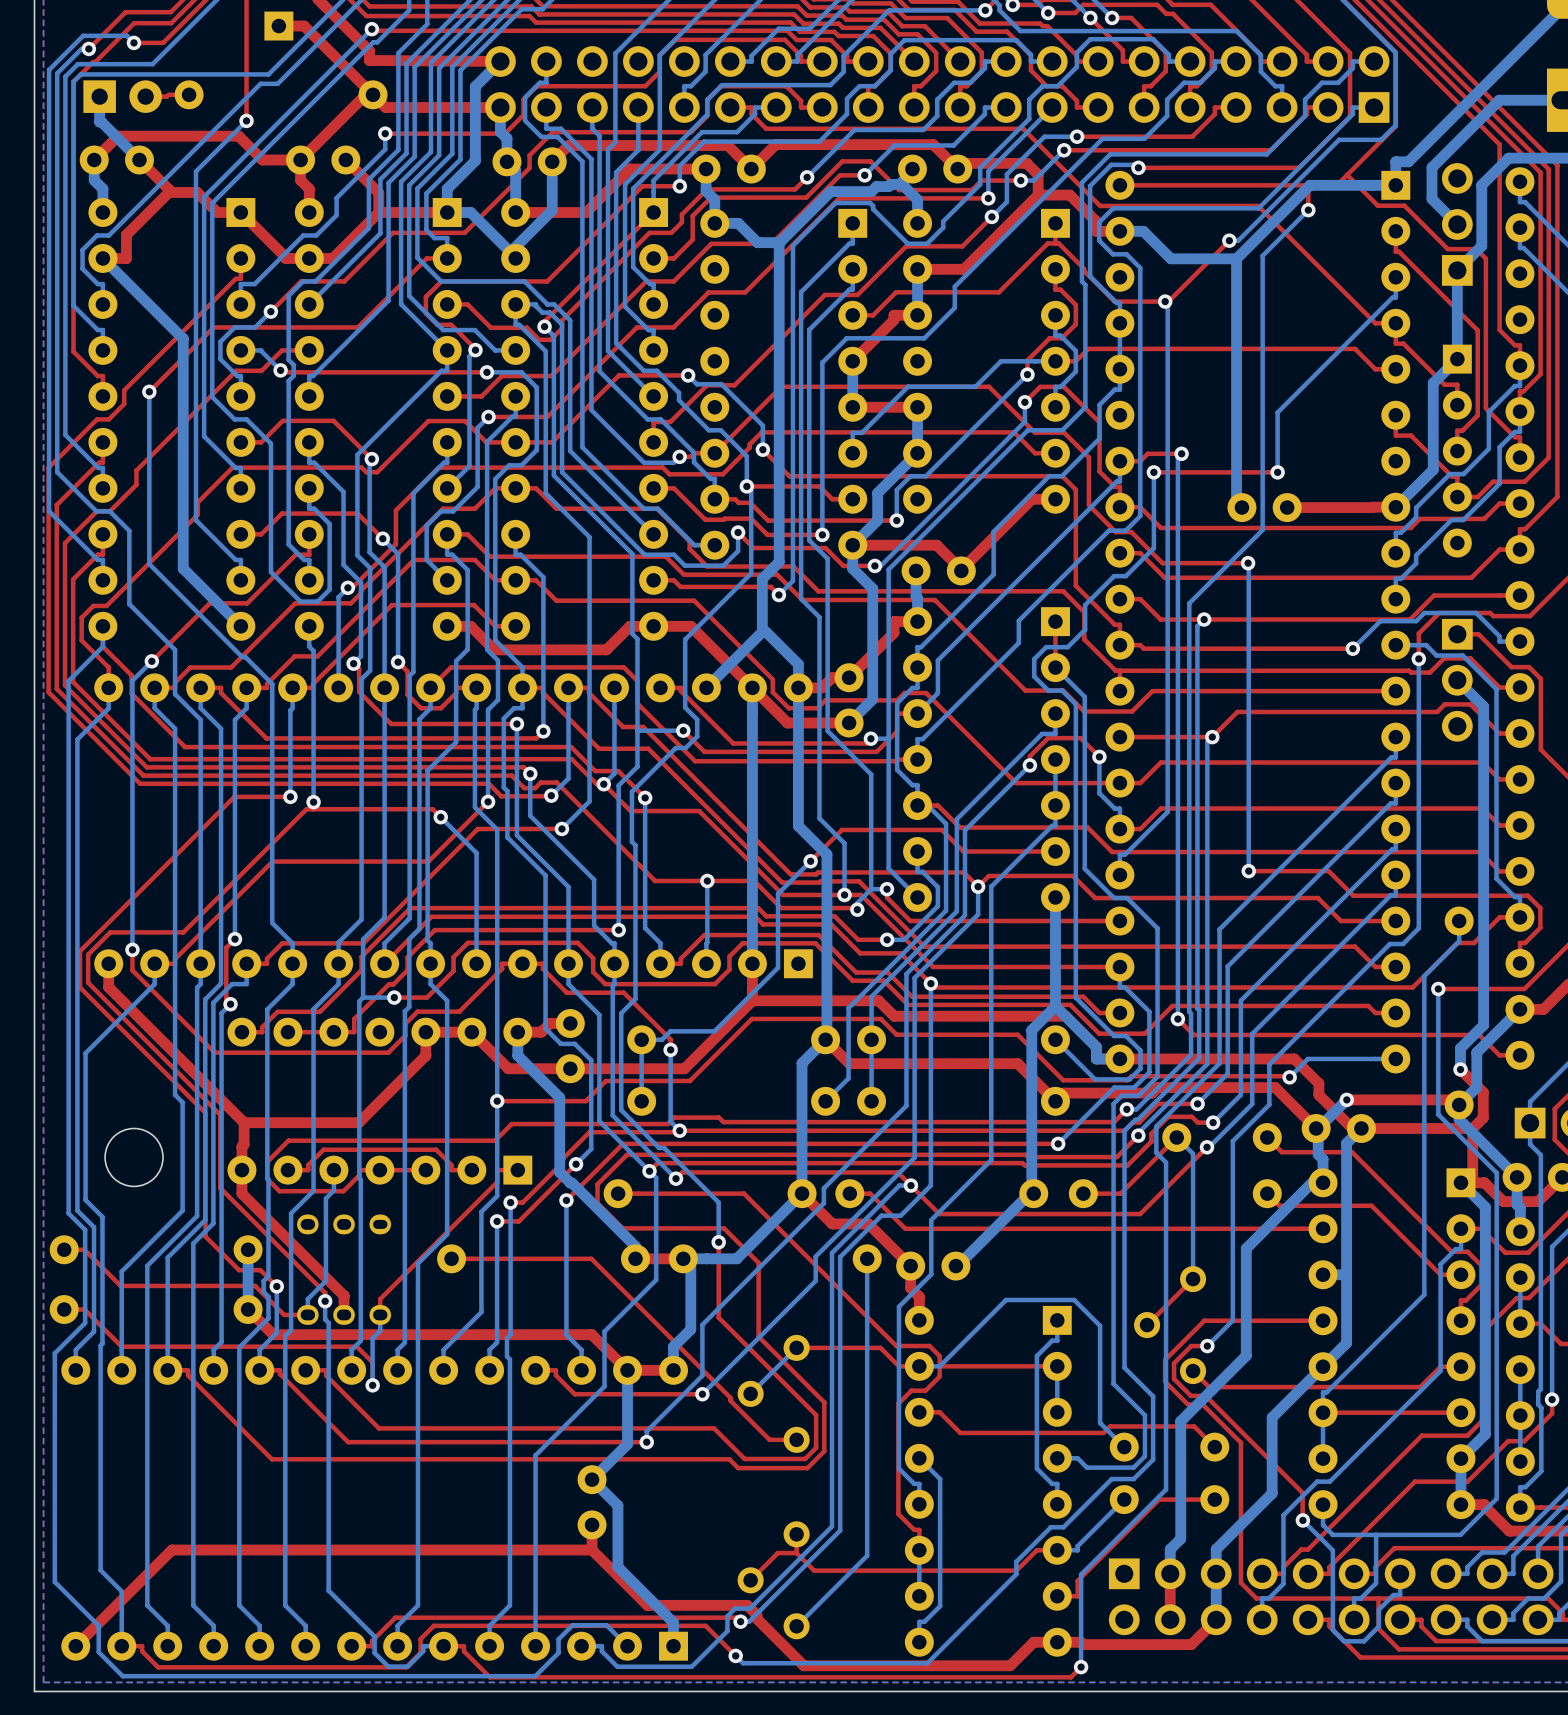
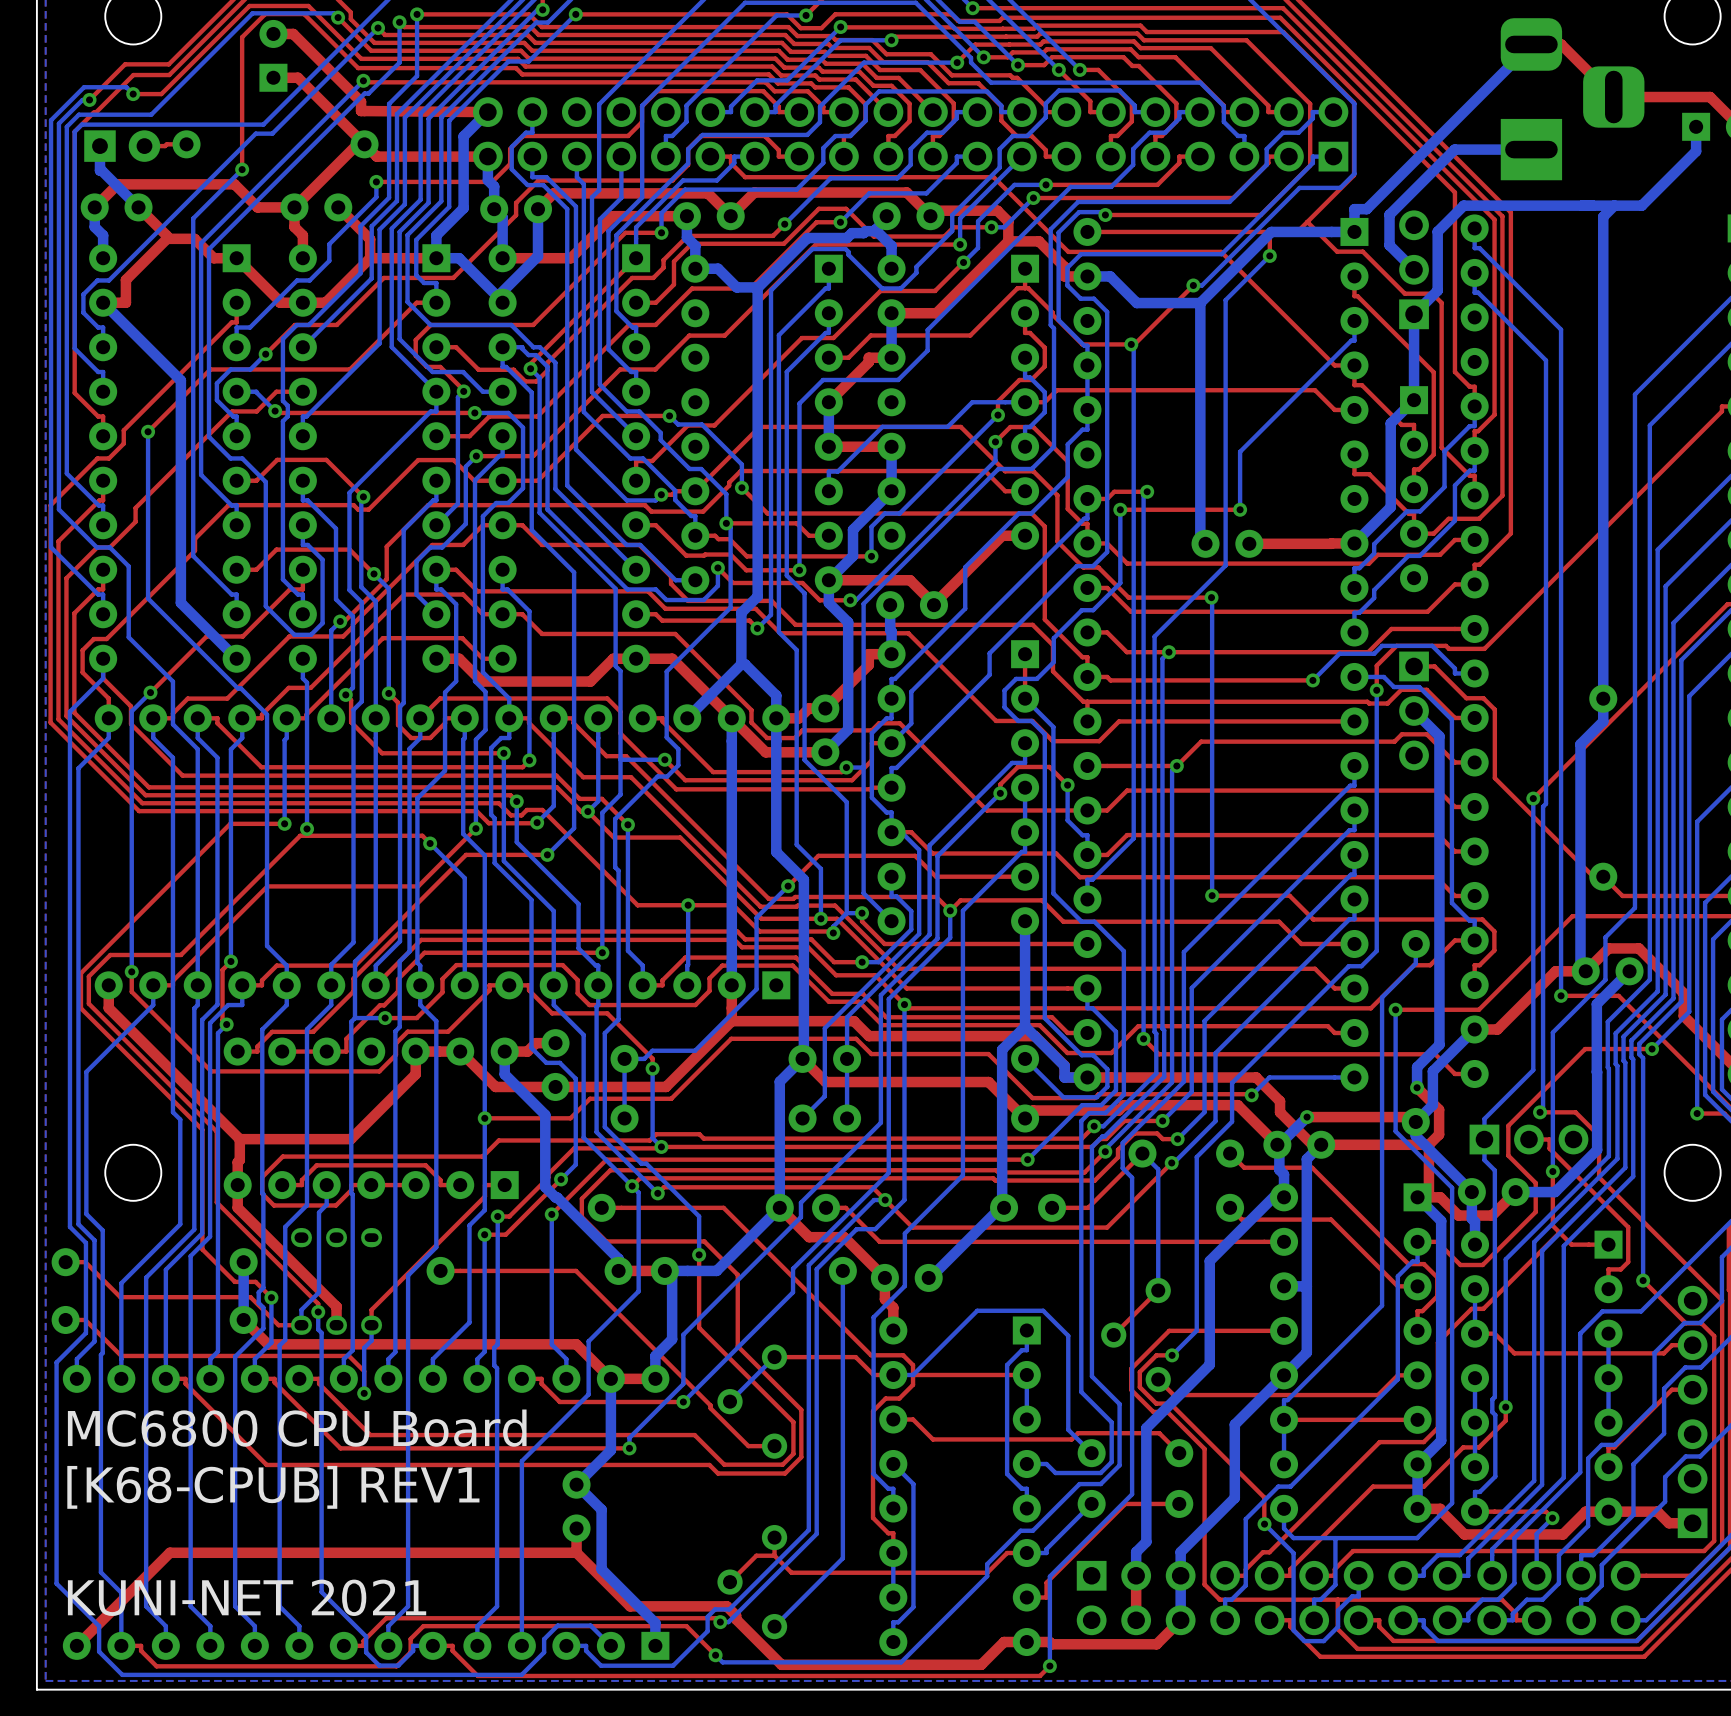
text: none -> MC6800 CPU Board (297, 1428)
text: none -> [K68-CPUB] REV1 (273, 1487)
text: none -> KUNI-NET 2021 (247, 1597)

